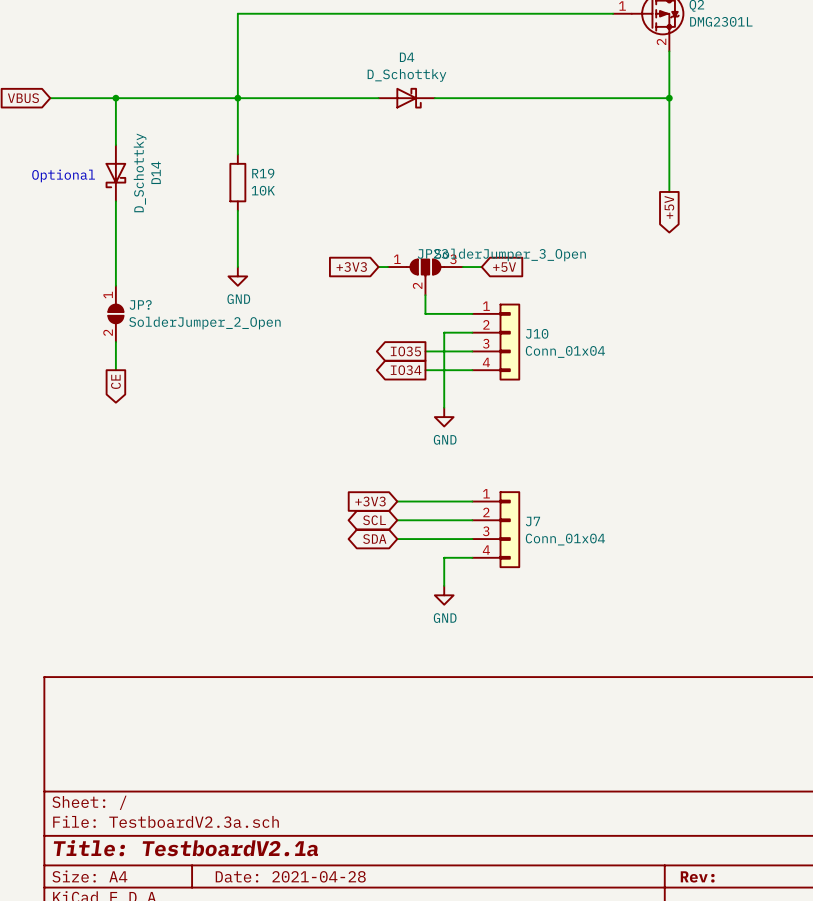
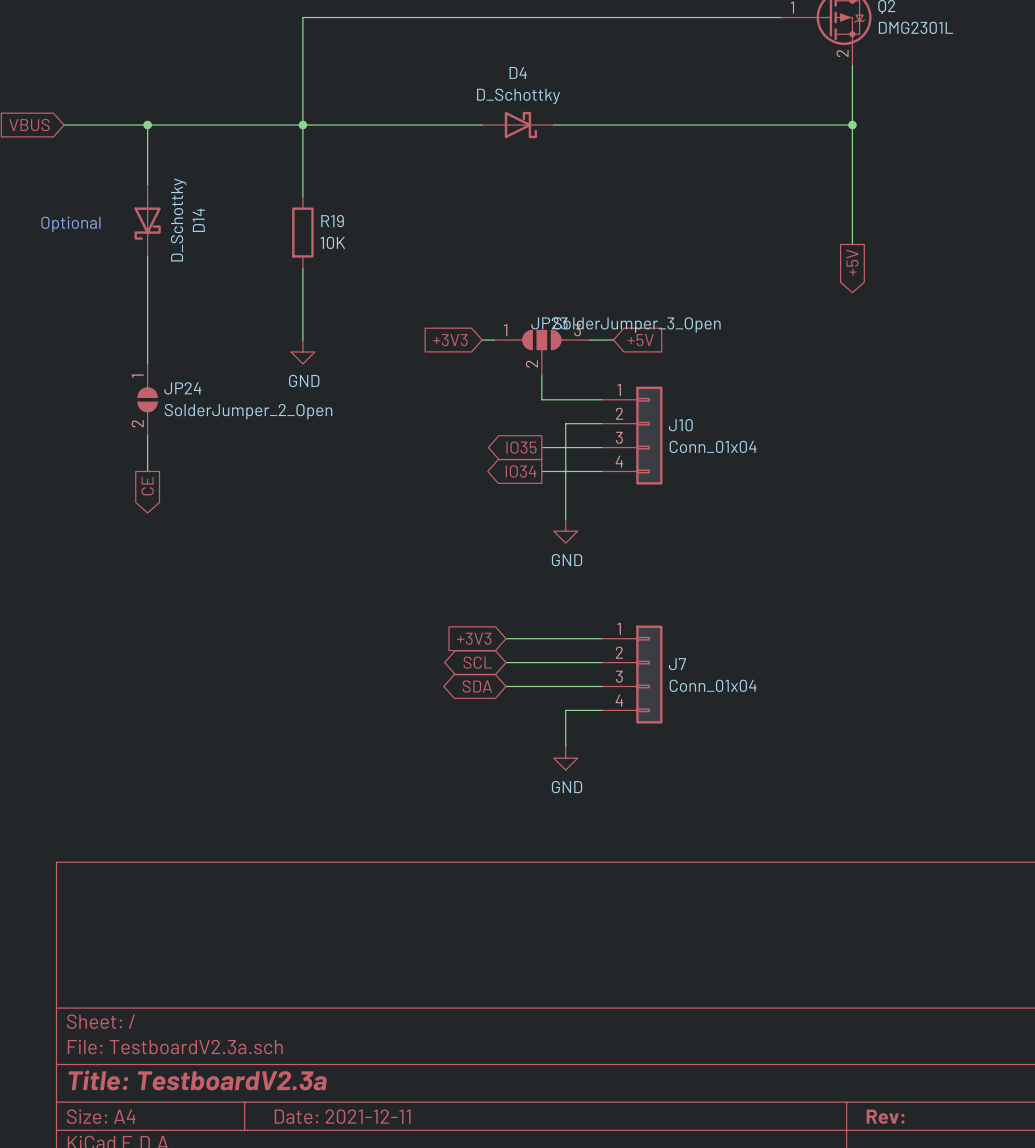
JP? name: JP? (140, 304) -> JP24 (182, 388)
title block: Title: TestboardV2.1a (185, 848) -> Title: TestboardV2.3a (197, 1080)
title block: Date: 2021-04-28 (290, 876) -> Date: 2021-12-11 (342, 1116)

